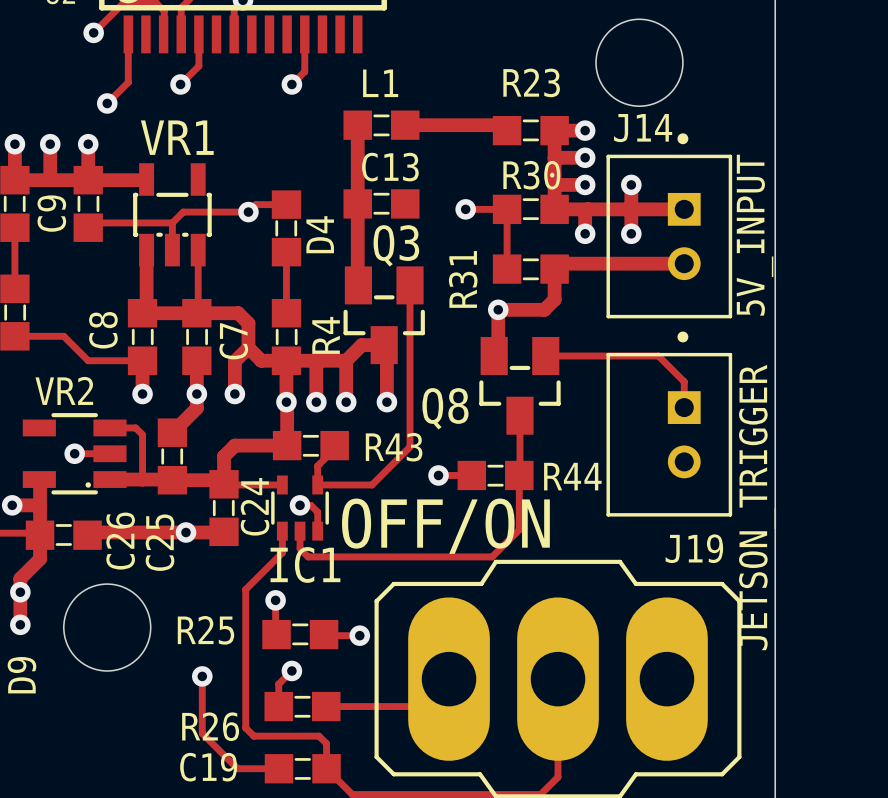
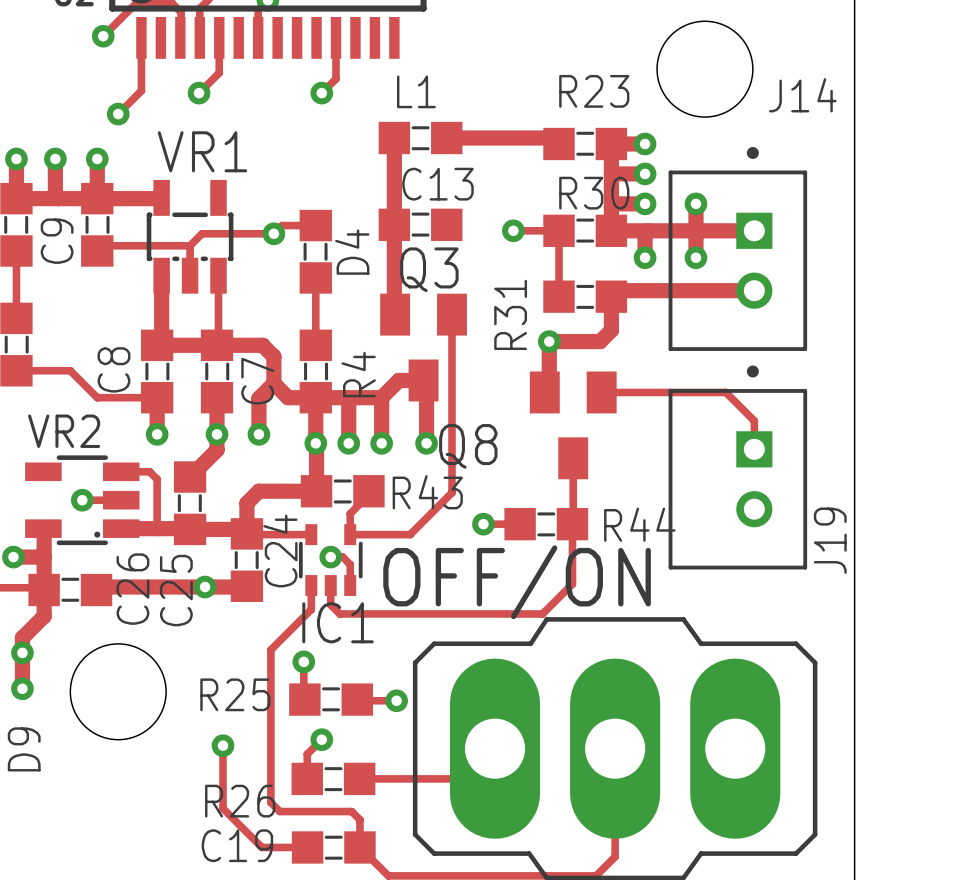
J14 name position: J14 (643, 128) -> J14 (802, 95)
J14 value: 5V_INPUT (755, 235) -> none
Q3 footprint: [343, 266, 425, 365] -> [380, 293, 467, 402]
Q8 footprint: [479, 336, 561, 435] -> [529, 371, 617, 480]
J19 value: JETSON_TRIGGER (757, 507) -> none
J19 name rotation: 0° (694, 548) -> 90° counterclockwise (830, 540)
J19 name position: J19 (694, 548) -> J19 (830, 540)

